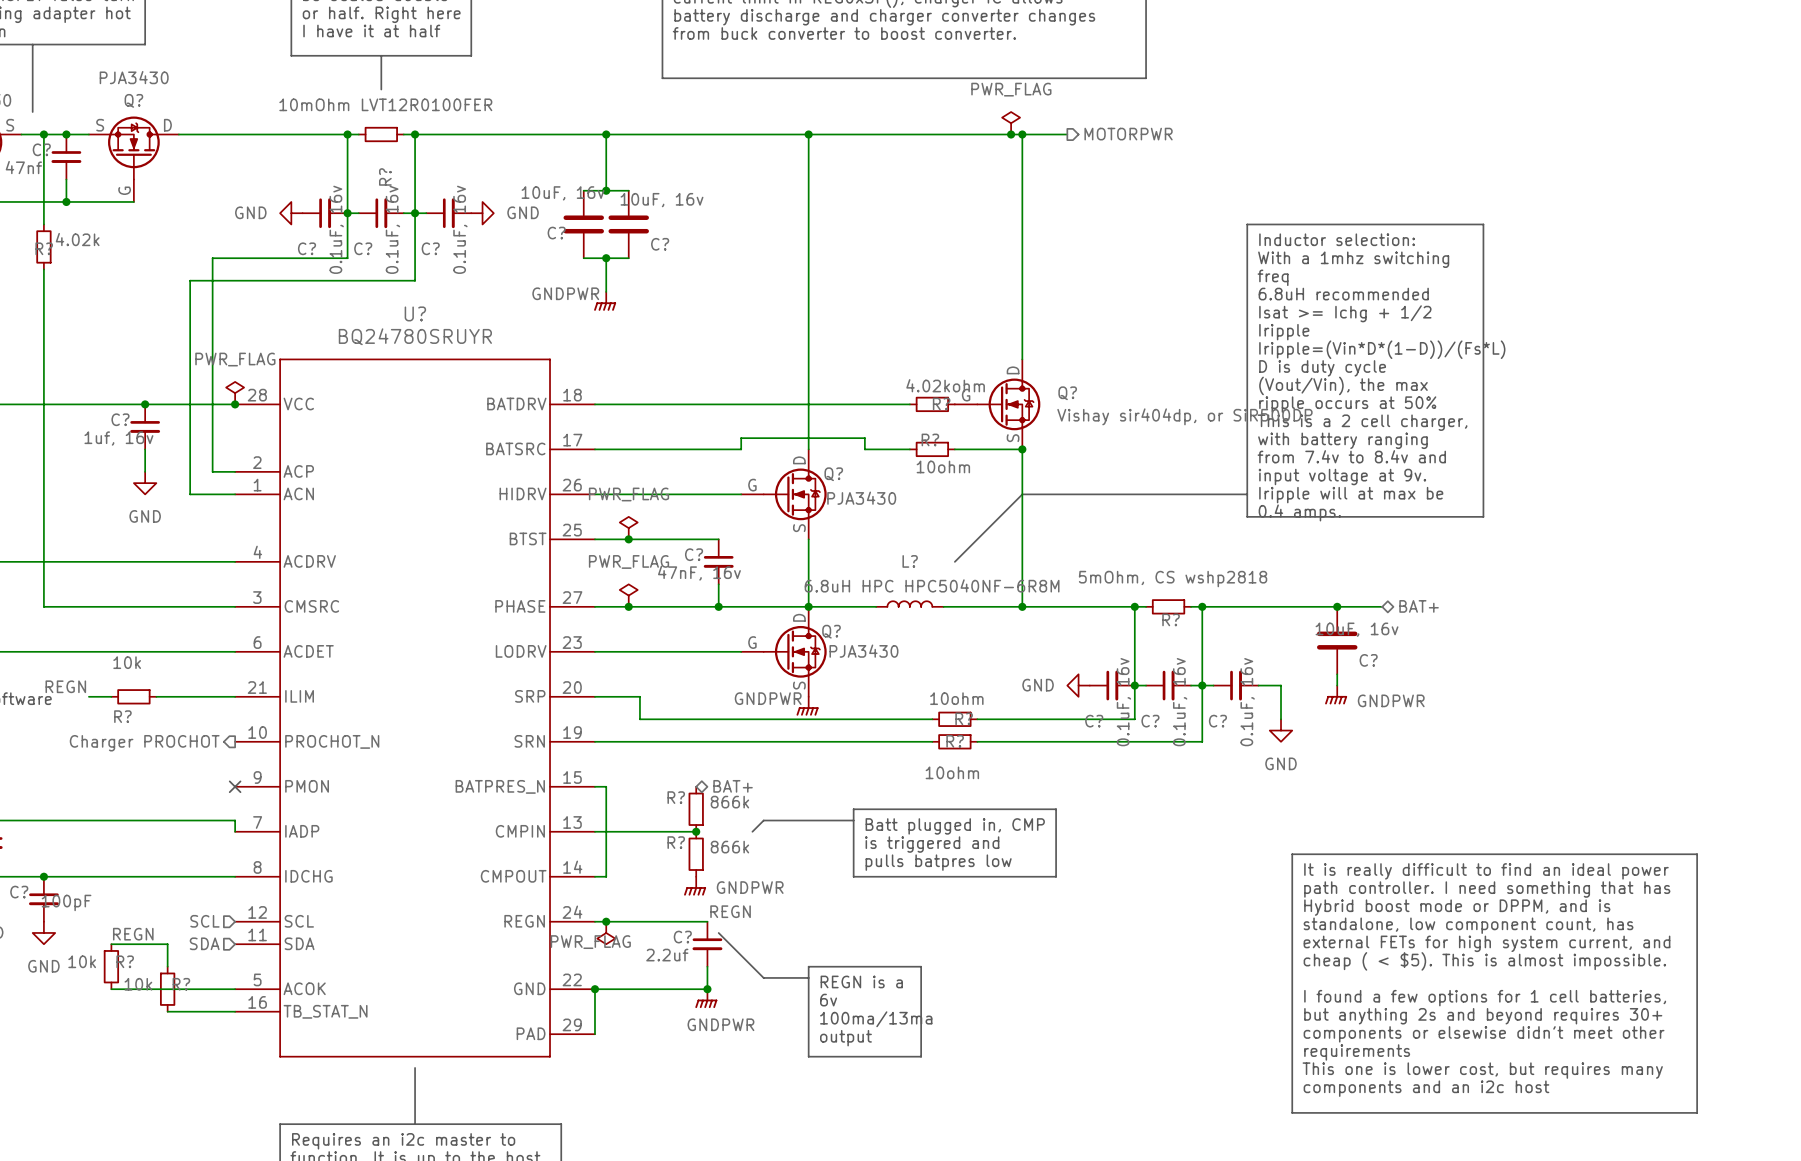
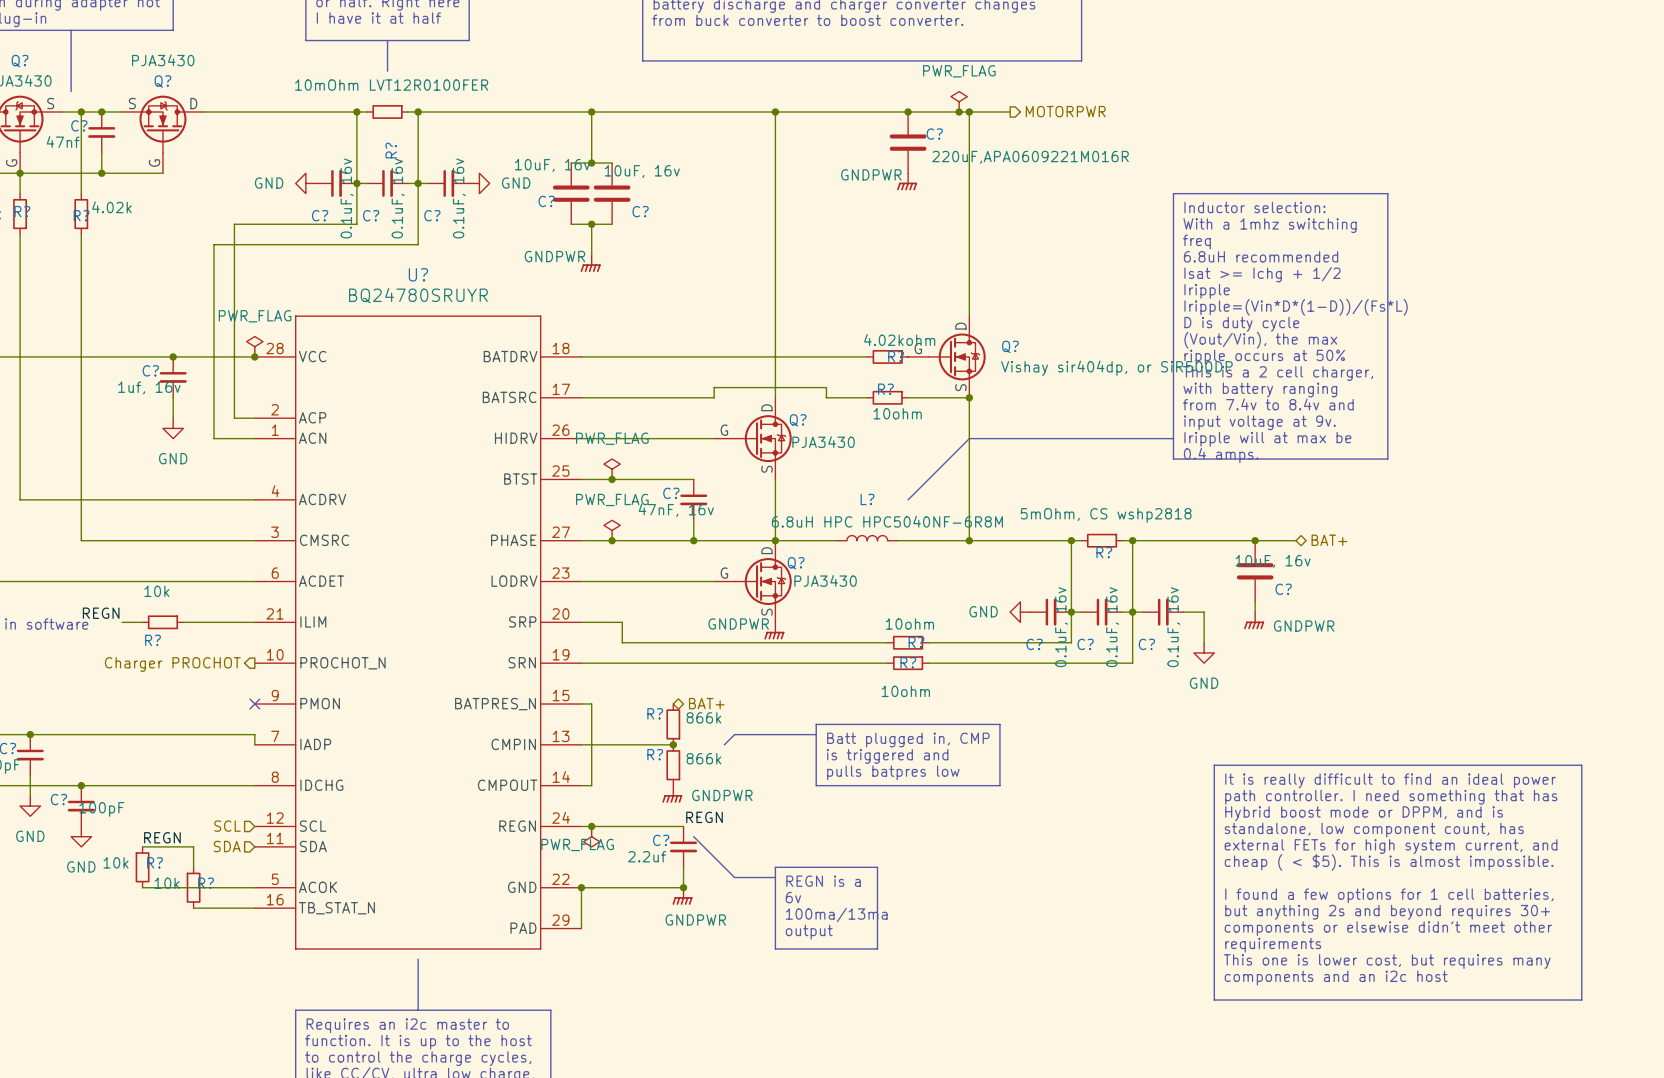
junction: none -> (908, 111)
C?: none -> 220uF,APA0609221M016R (908, 142)
power symbol: none -> GNDPWR (907, 181)

